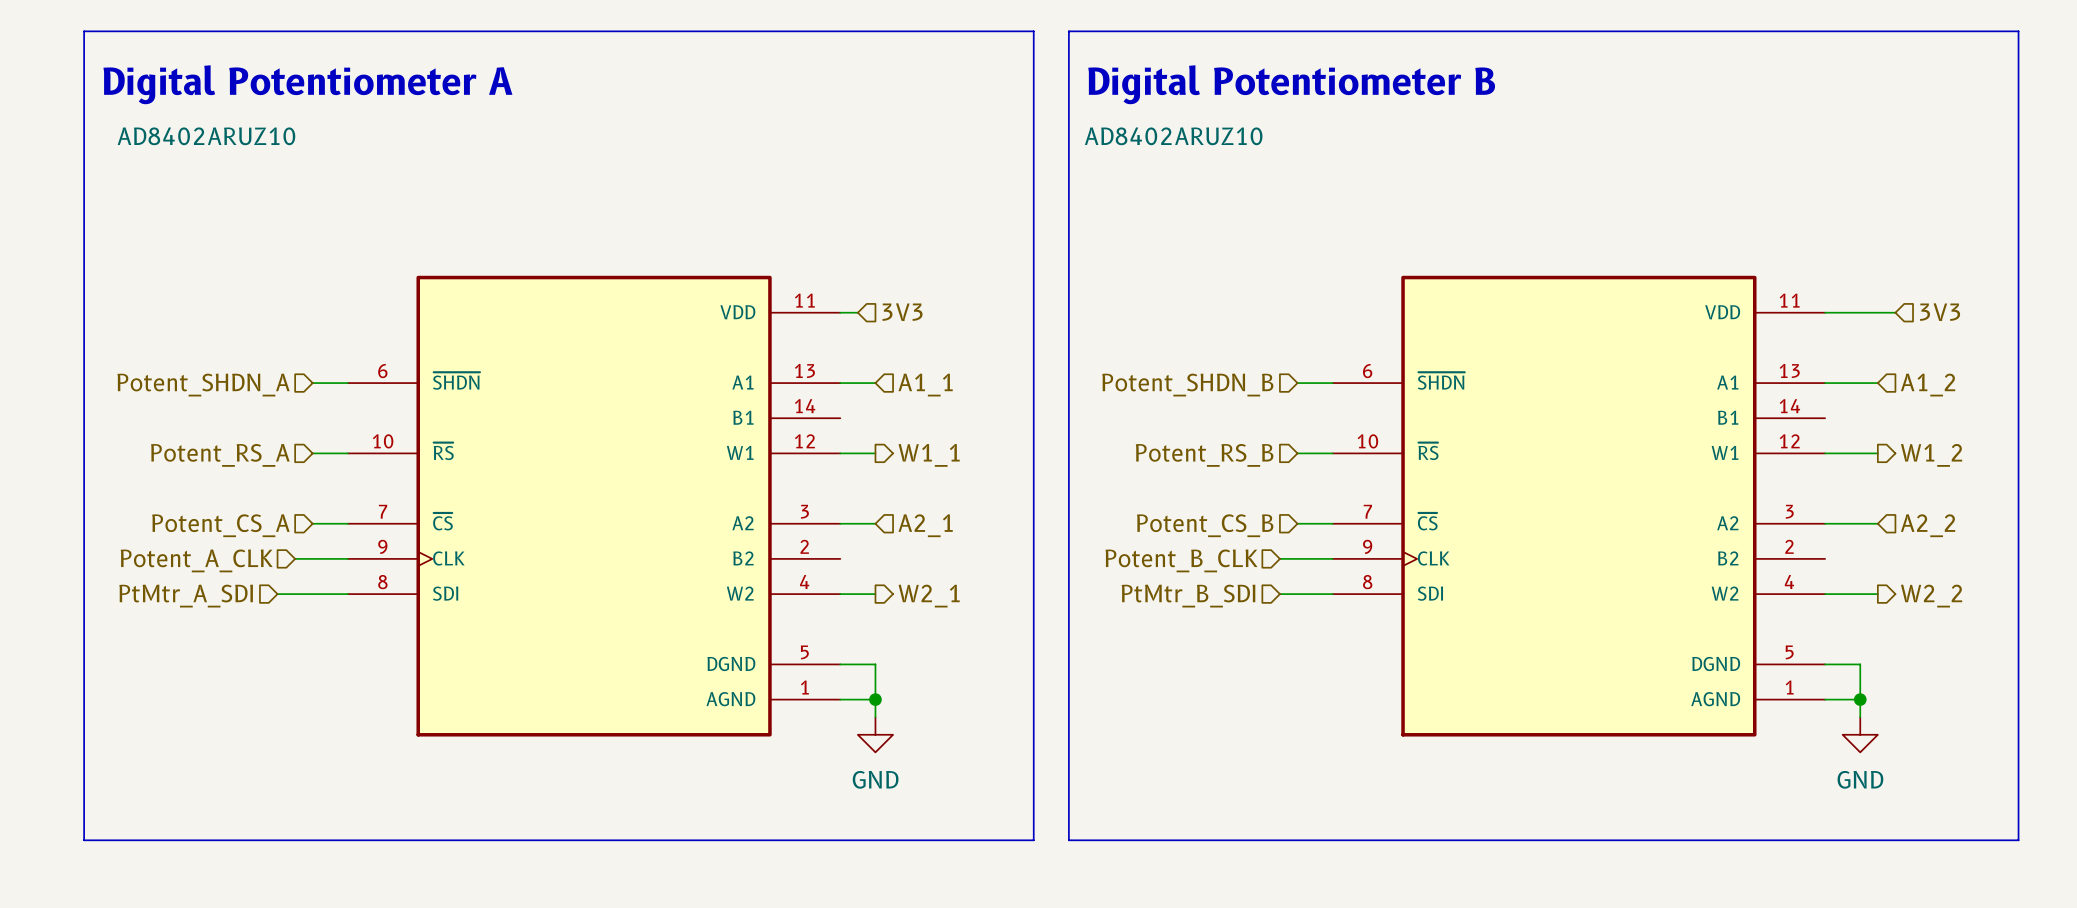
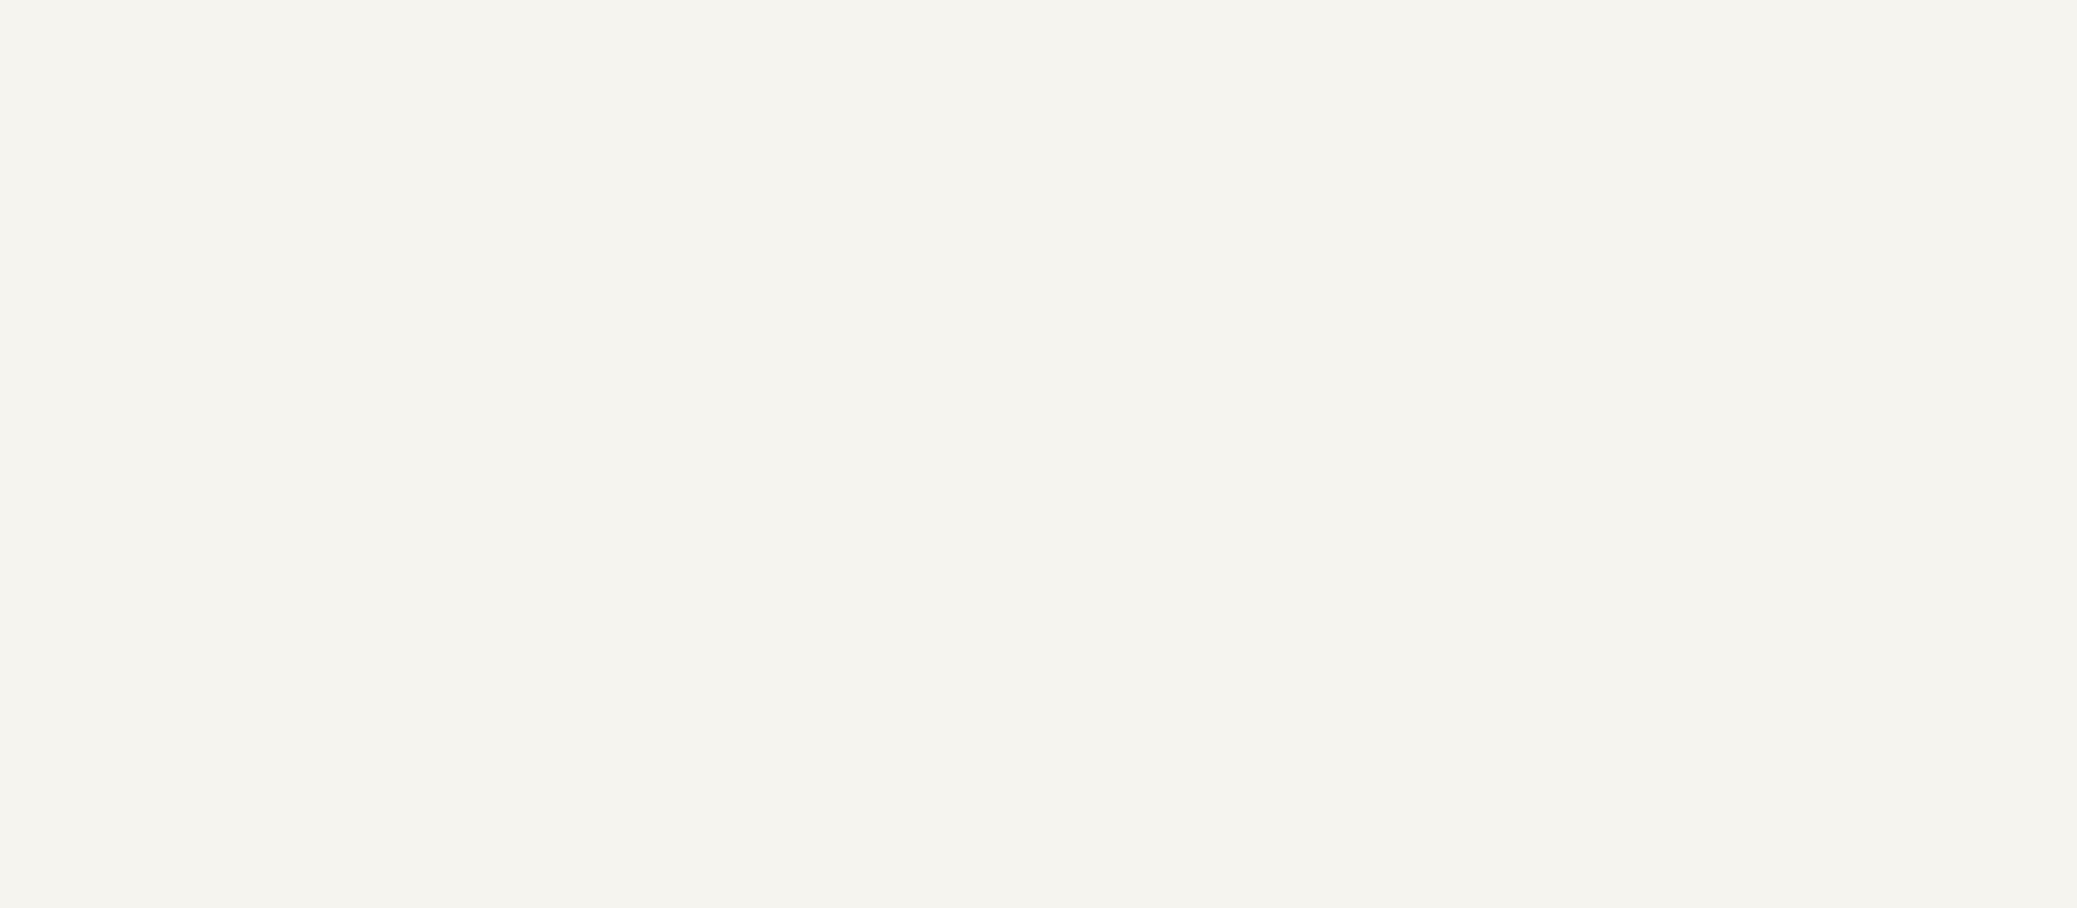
line: (84, 31) (1033, 31) (1033, 840) (84, 840) (84, 31) -> none
line: (1068, 31) (2018, 31) (2018, 840) (1068, 840) (1068, 31) -> none
text: Digital Potentiometer A (307, 84) -> none
text: Digital Potentiometer B (1291, 84) -> none
wire: (840, 312) (857, 312) -> none
hierarchical label: 3V3 (902, 312) -> none
wire: (1825, 312) (1895, 312) -> none
hierarchical label: 3V3 (1940, 312) -> none
wire: (312, 383) (347, 383) -> none
wire: (840, 383) (875, 383) -> none
wire: (1297, 383) (1332, 383) -> none
wire: (1825, 383) (1877, 383) -> none
hierarchical label: Potent_SHDN_A (203, 385) -> none
hierarchical label: A1_1 (925, 385) -> none
hierarchical label: Potent_SHDN_B (1187, 385) -> none
hierarchical label: A1_2 (1928, 385) -> none
wire: (312, 453) (347, 453) -> none
wire: (840, 453) (875, 453) -> none
wire: (1297, 453) (1332, 453) -> none
wire: (1825, 453) (1877, 453) -> none
hierarchical label: Potent_RS_A (220, 455) -> none
hierarchical label: W1_1 (929, 455) -> none
hierarchical label: Potent_RS_B (1204, 455) -> none
hierarchical label: W1_2 (1931, 455) -> none
part: AD8402ARUZ10 (594, 506) -> none
part: AD8402ARUZ10 (1578, 506) -> none
wire: (312, 523) (347, 523) -> none
wire: (840, 523) (875, 523) -> none
wire: (1297, 523) (1332, 523) -> none
wire: (1825, 523) (1877, 523) -> none
hierarchical label: Potent_CS_A (220, 525) -> none
hierarchical label: A2_1 (925, 525) -> none
hierarchical label: Potent_CS_B (1205, 525) -> none
hierarchical label: A2_2 (1928, 525) -> none
wire: (295, 558) (347, 558) -> none
wire: (1279, 558) (1332, 558) -> none
hierarchical label: Potent_A_CLK (196, 560) -> none
hierarchical label: Potent_B_CLK (1181, 560) -> none
wire: (277, 594) (347, 594) -> none
wire: (840, 594) (875, 594) -> none
wire: (1279, 594) (1332, 594) -> none
wire: (1825, 594) (1877, 594) -> none
hierarchical label: PtMtr_A_SDI (186, 596) -> none
hierarchical label: W2_1 (929, 596) -> none
hierarchical label: PtMtr_B_SDI (1188, 596) -> none
hierarchical label: W2_2 (1931, 596) -> none
wire: (840, 664) (875, 664) (875, 717) -> none
wire: (1825, 664) (1860, 664) (1860, 717) -> none
wire: (840, 699) (875, 699) -> none
junction: (875, 699) -> none
wire: (1825, 699) (1860, 699) -> none
junction: (1860, 699) -> none
power symbol: GND (875, 734) -> none
power symbol: GND (1860, 734) -> none

